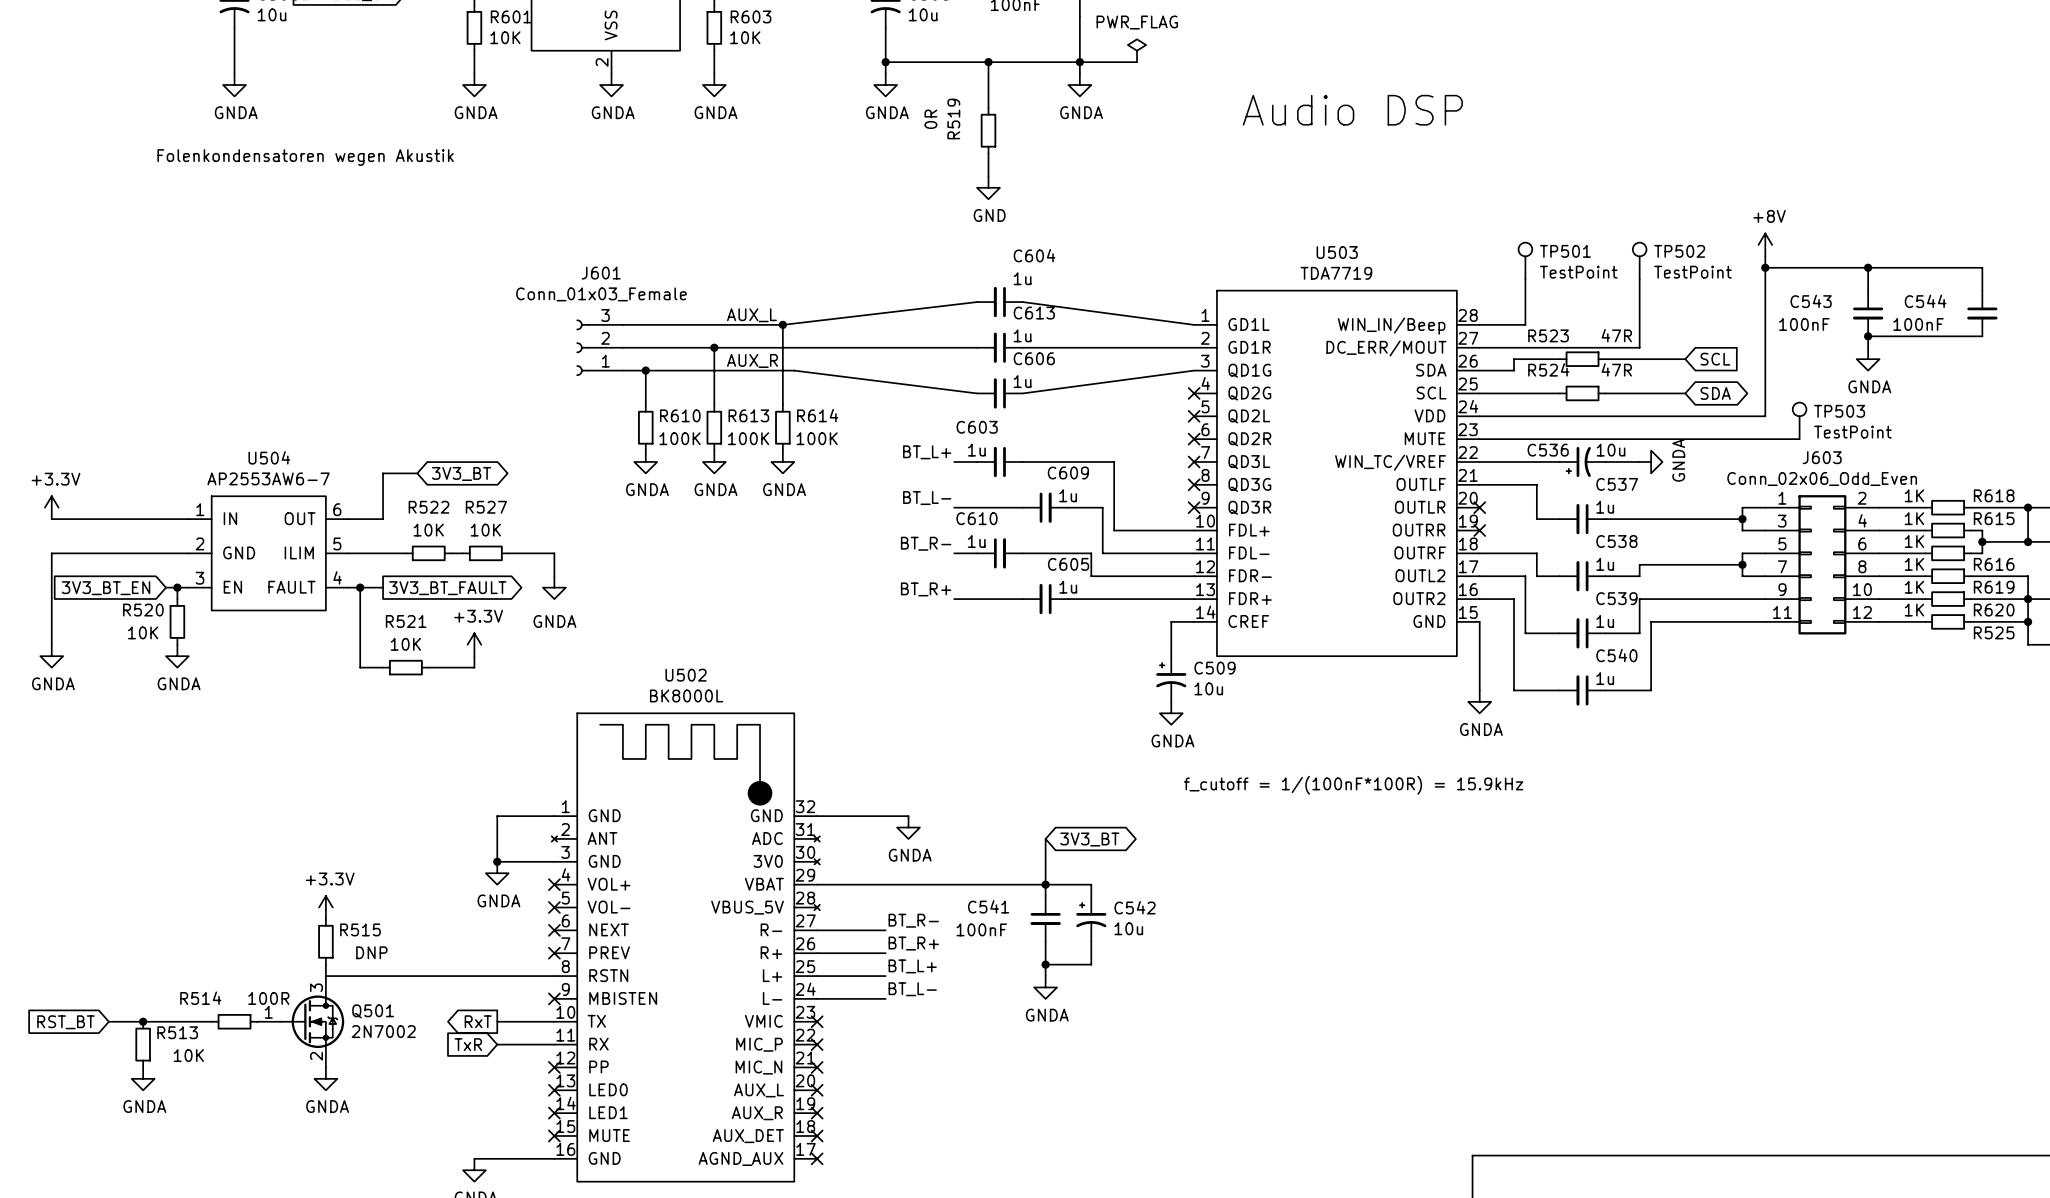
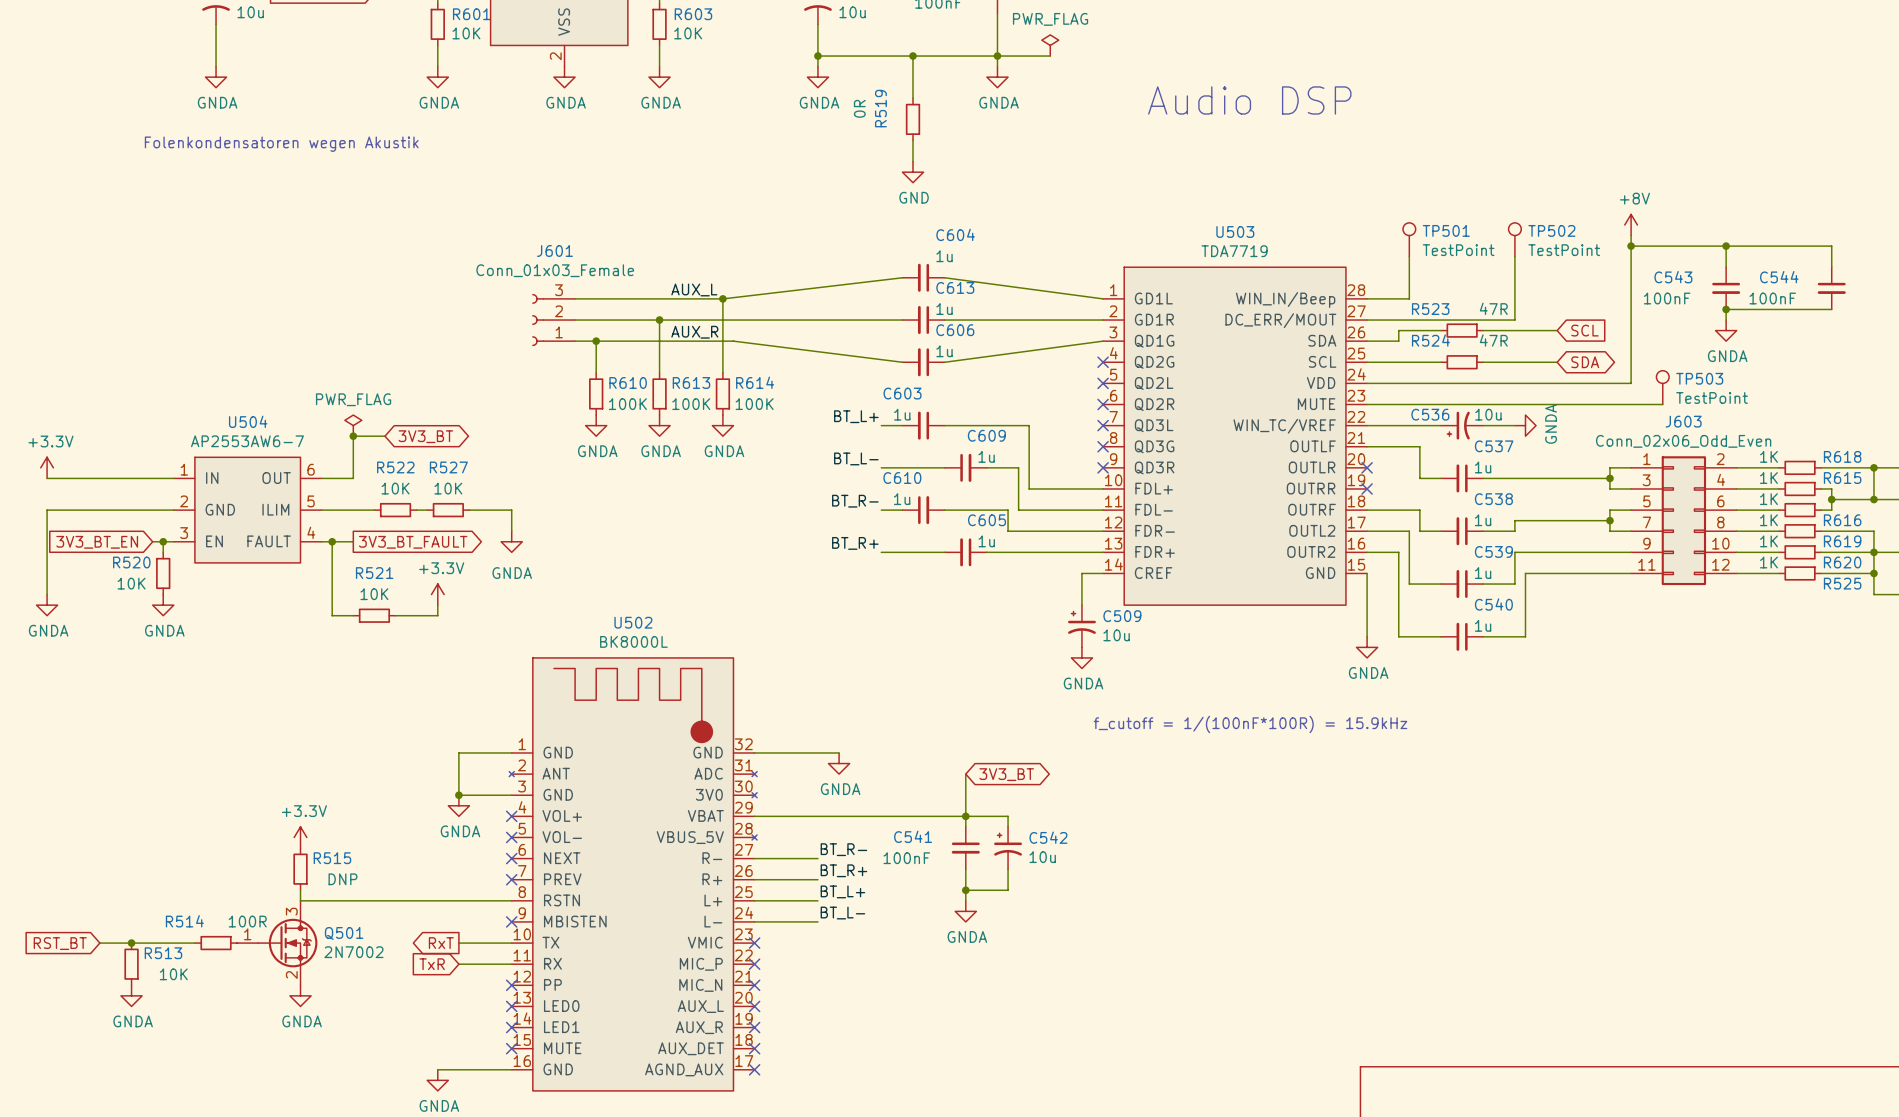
power symbol: none -> PWR_FLAG (353, 425)
junction: none -> (353, 436)

